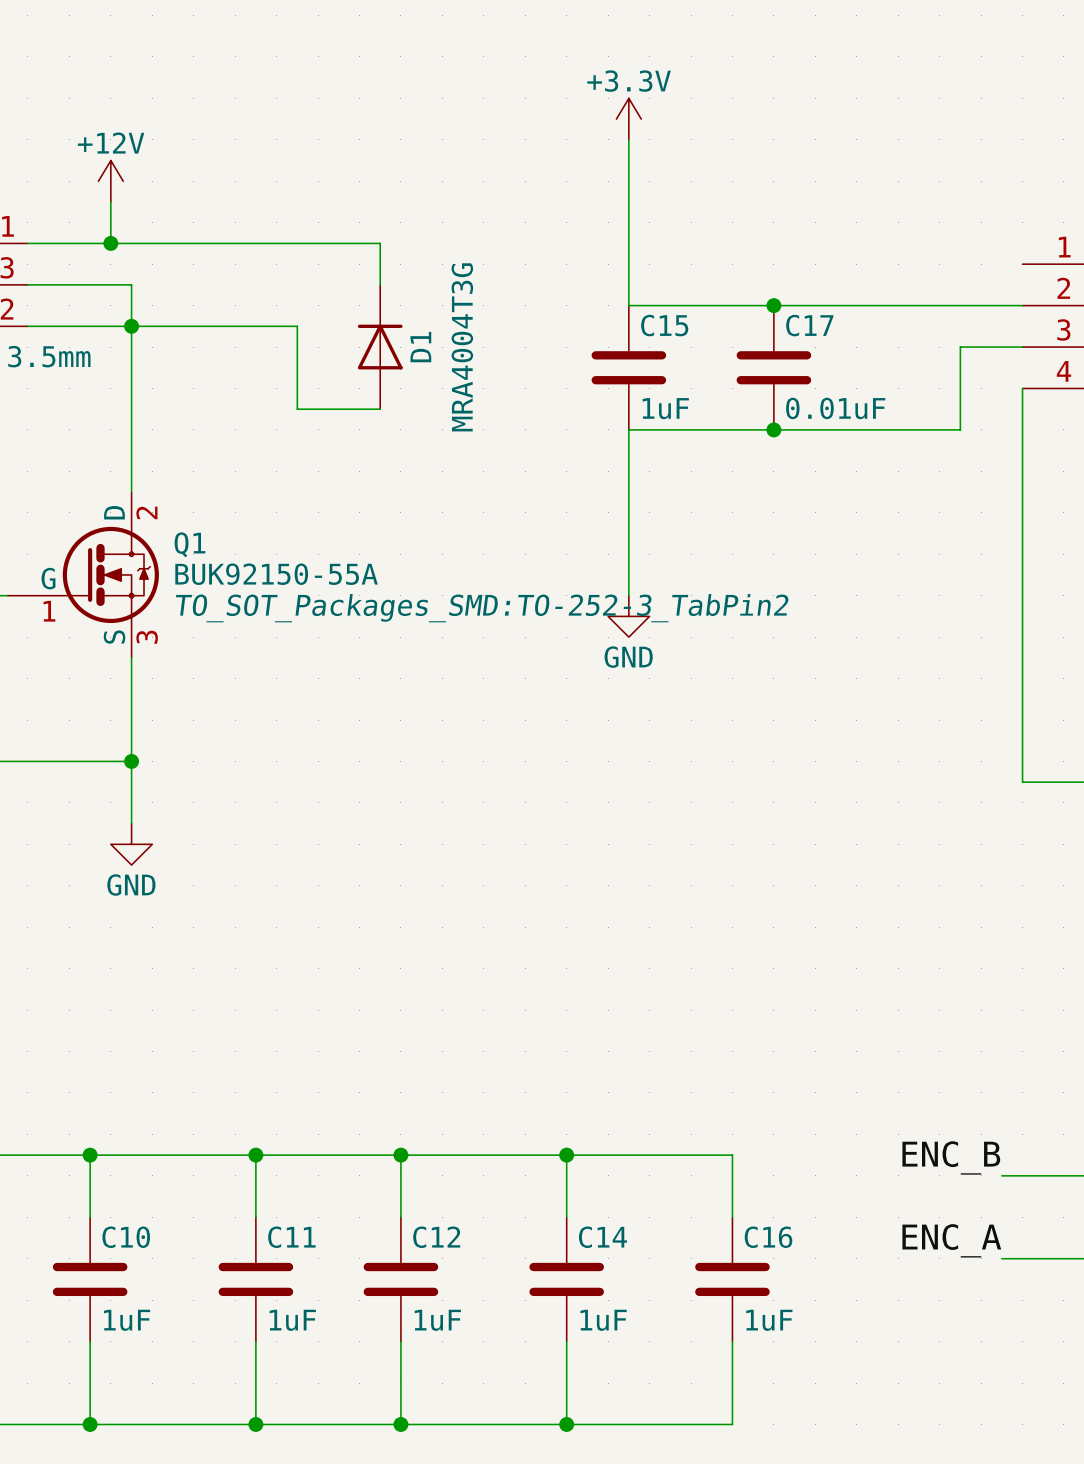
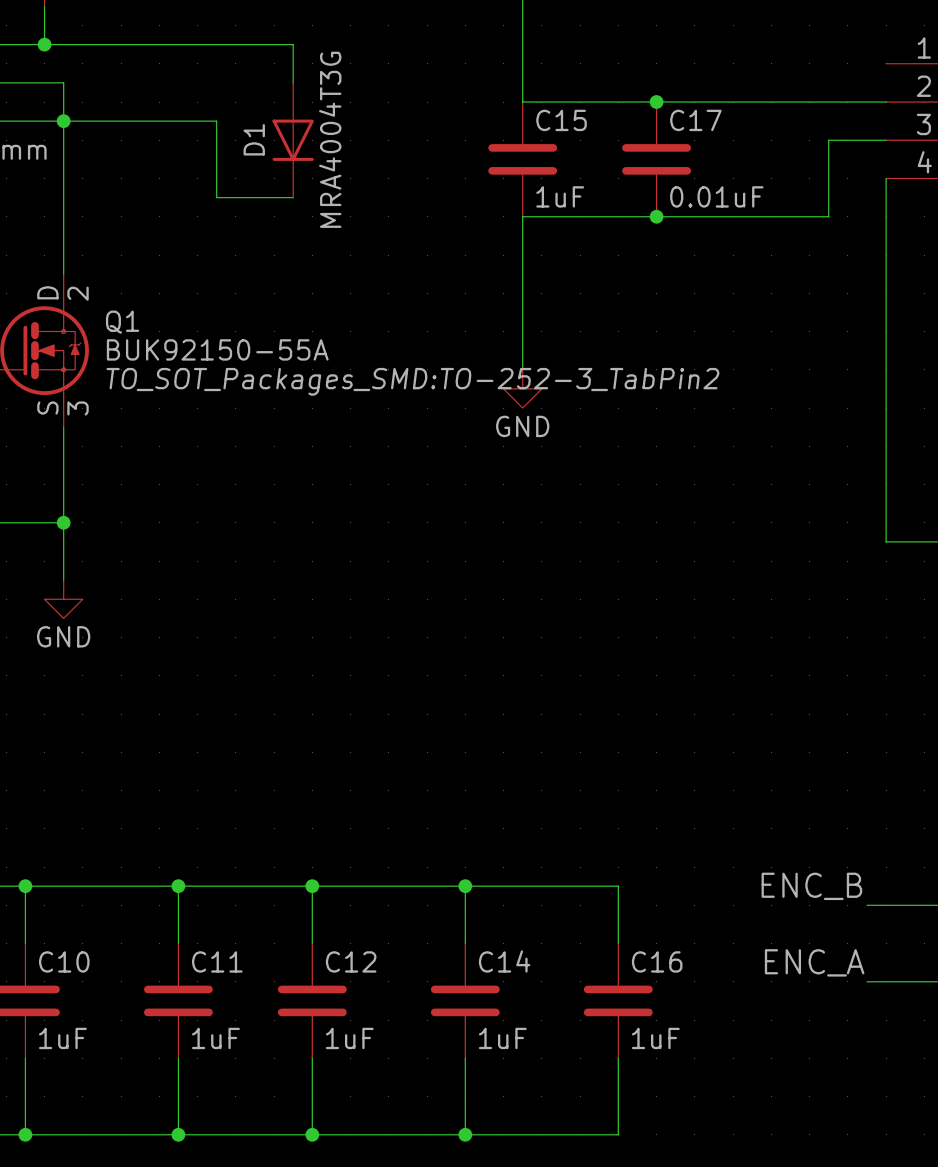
D1 rotation: 0° (380, 347) -> 180° (293, 140)
D1 value position: MRA4004T3G (462, 347) -> MRA4004T3G (330, 139)

